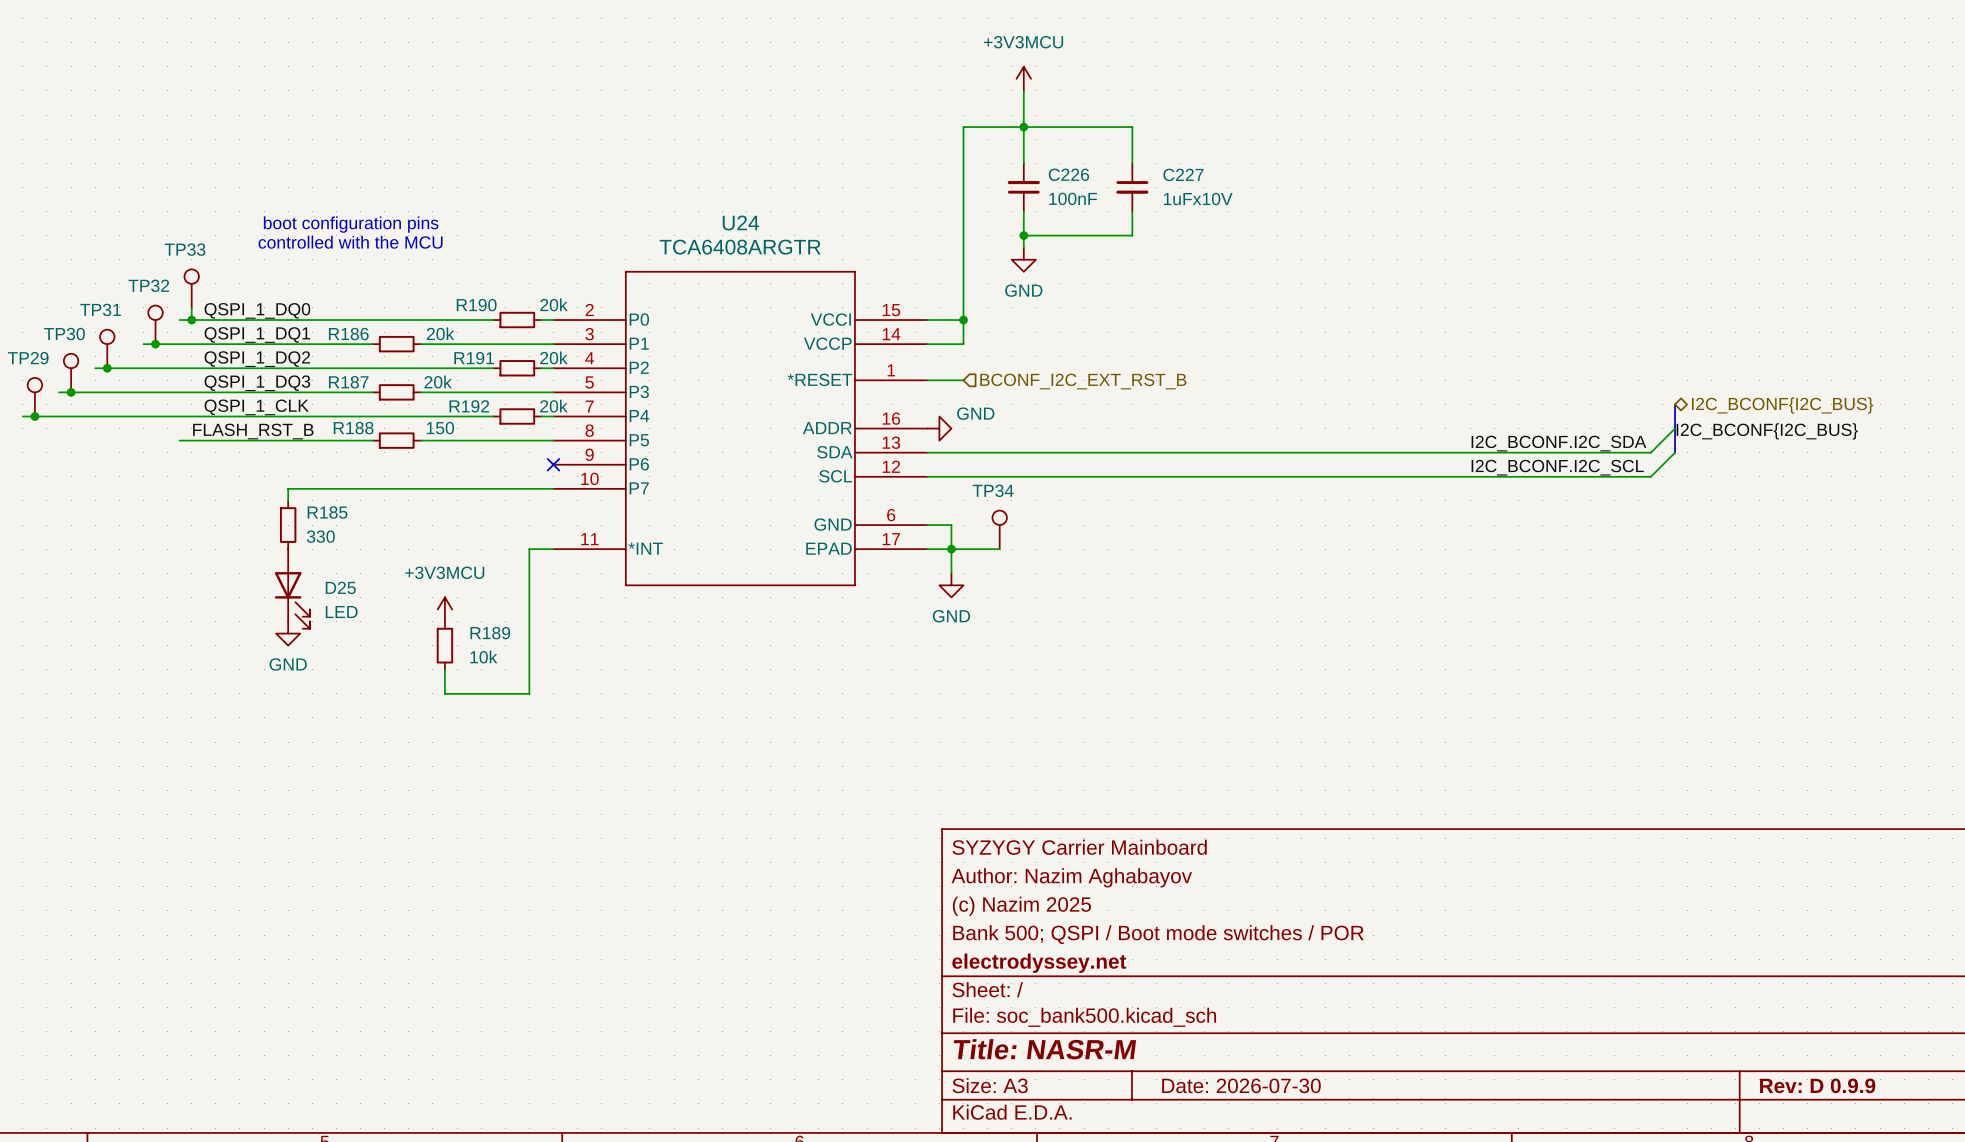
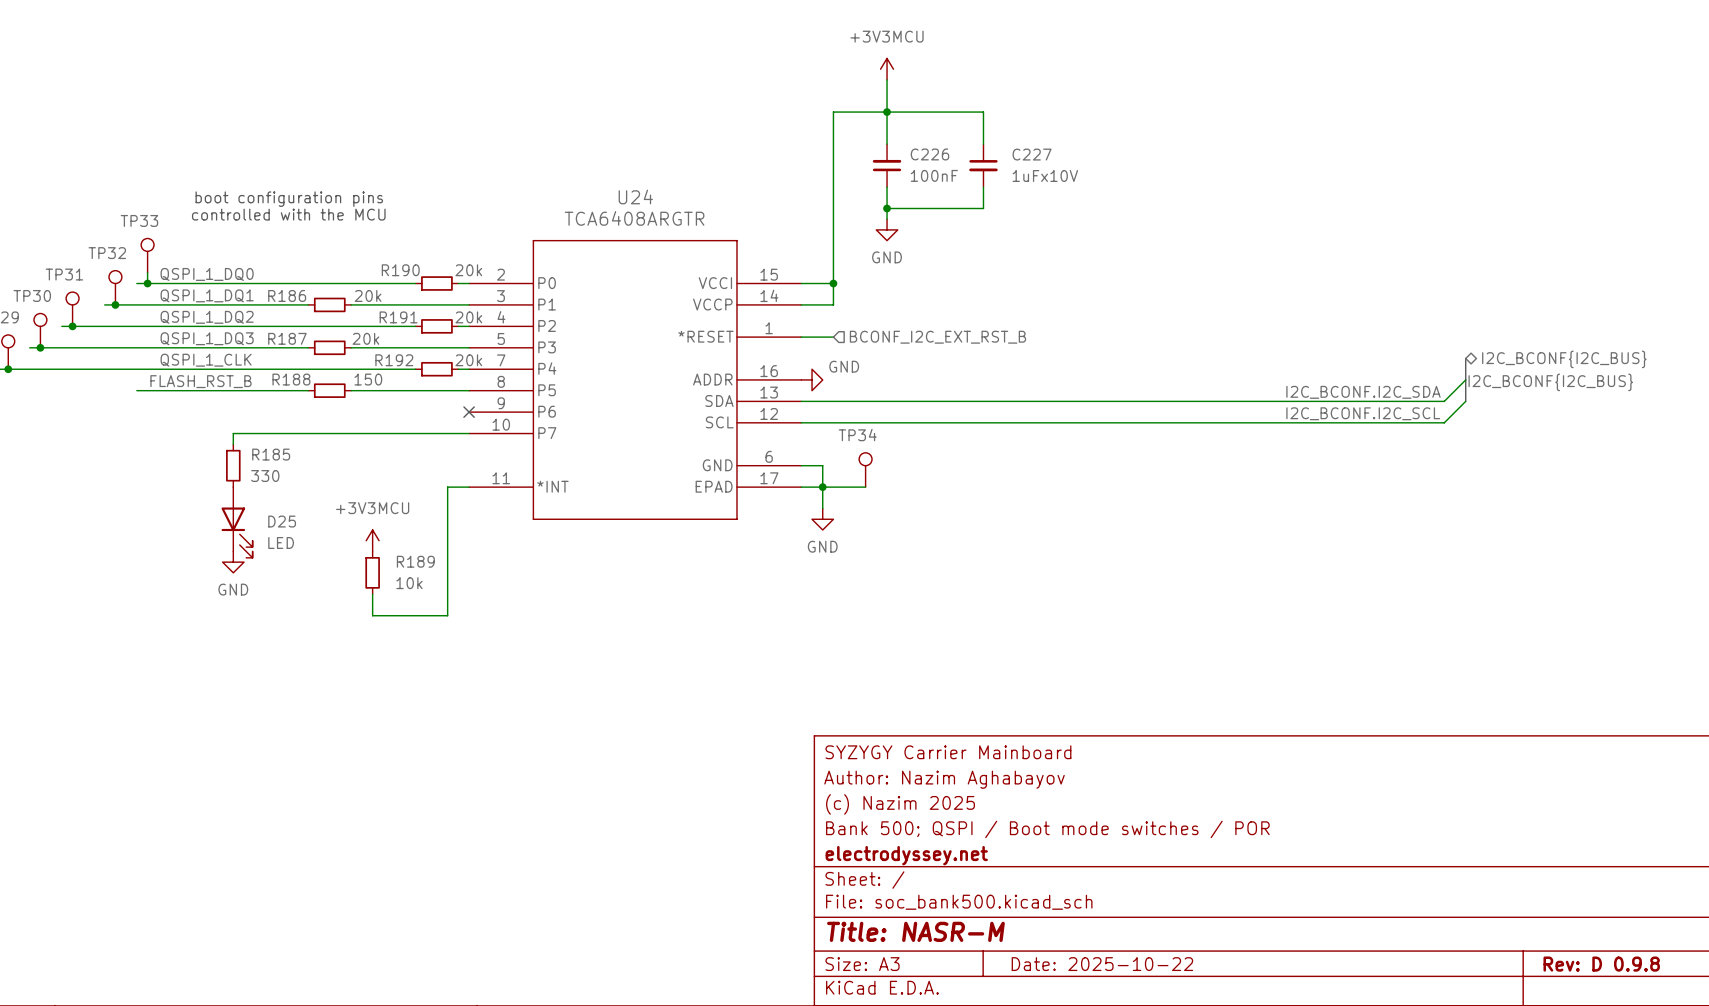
title block: Date: 2026-07-30 (1241, 1085) -> Date: 2025-10-22 (1102, 964)
title block: Rev: D 0.9.9 (1817, 1085) -> Rev: D 0.9.8 (1601, 964)

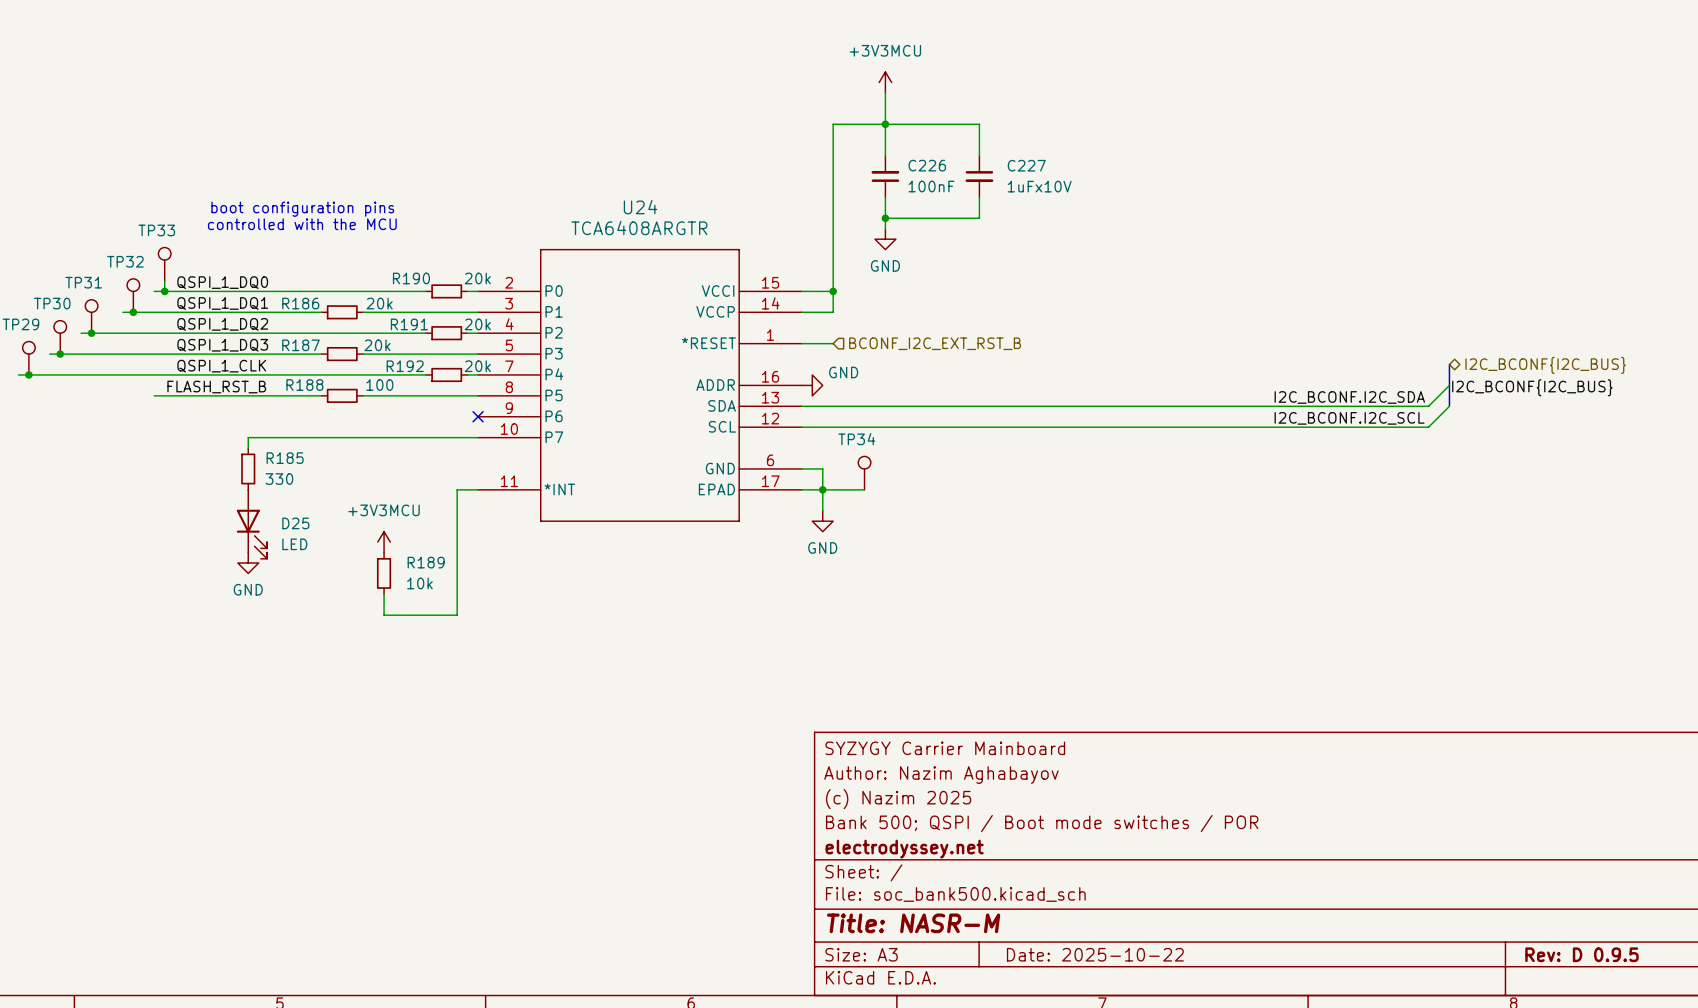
R188 value: 150 (368, 379) -> 100 (379, 385)
title block: Rev: D 0.9.8 (1601, 964) -> Rev: D 0.9.5 (1581, 954)

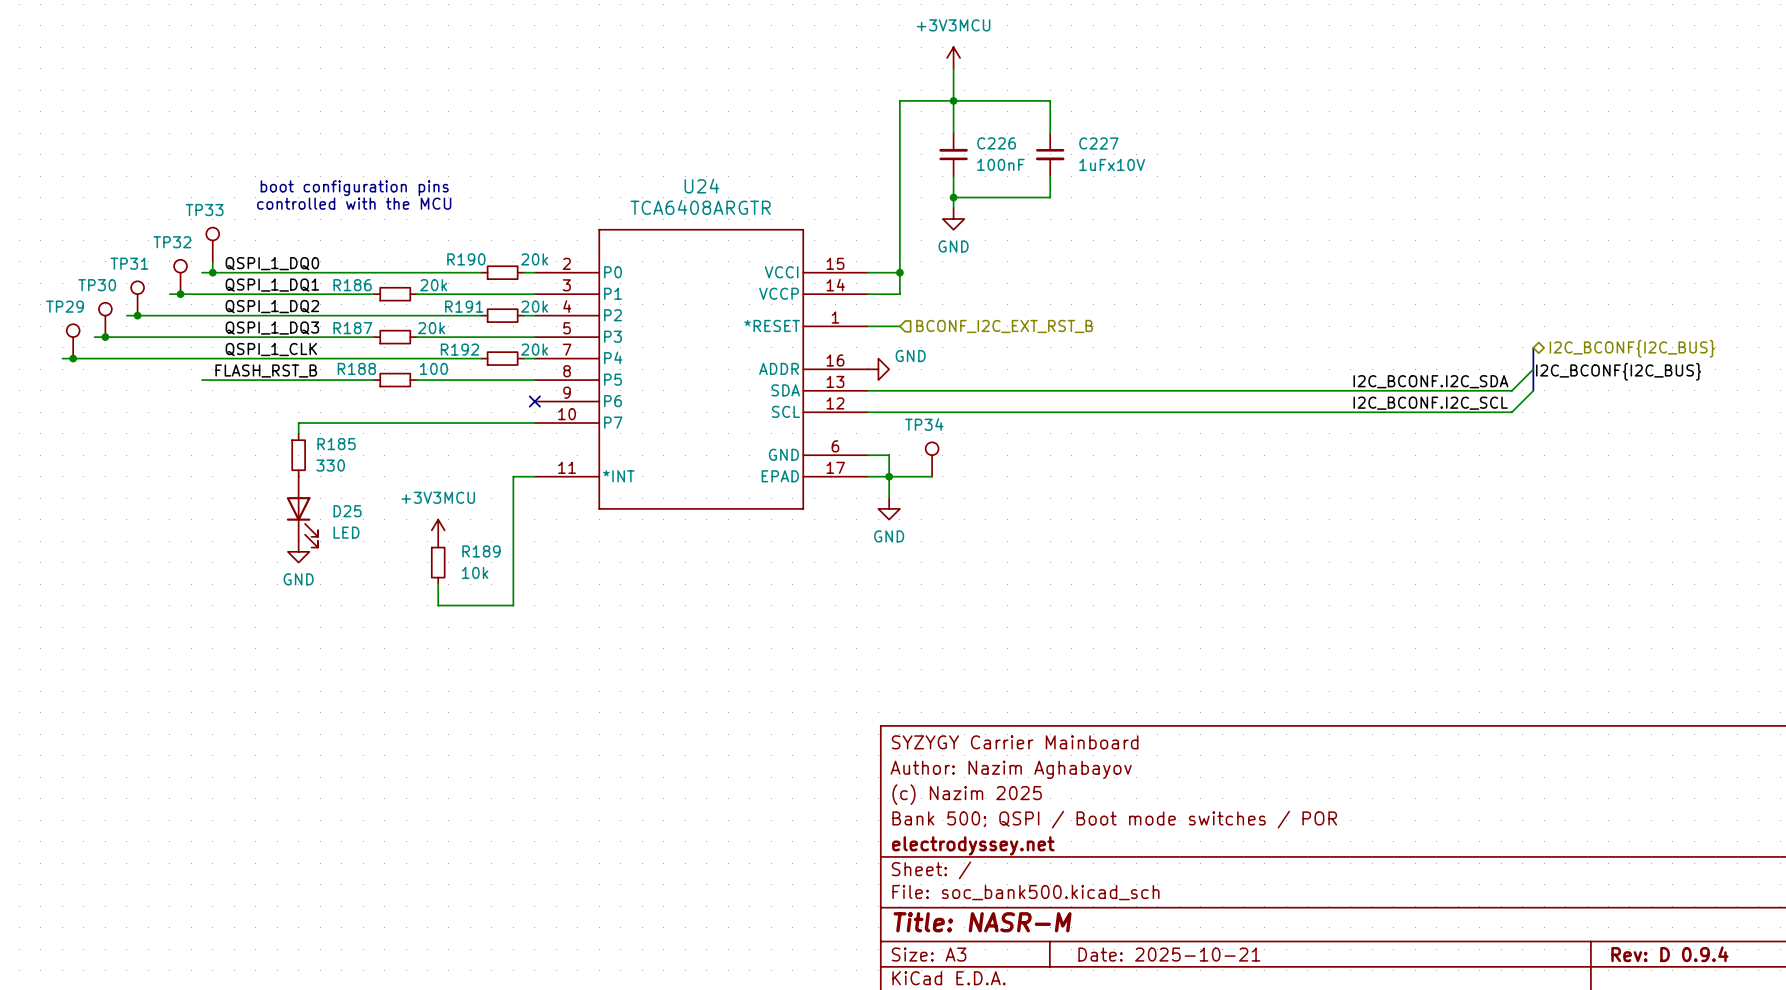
title block: Date: 2025-10-22 (1095, 954) -> Date: 2025-10-21 (1169, 954)
title block: Rev: D 0.9.5 (1581, 954) -> Rev: D 0.9.4 (1669, 954)

